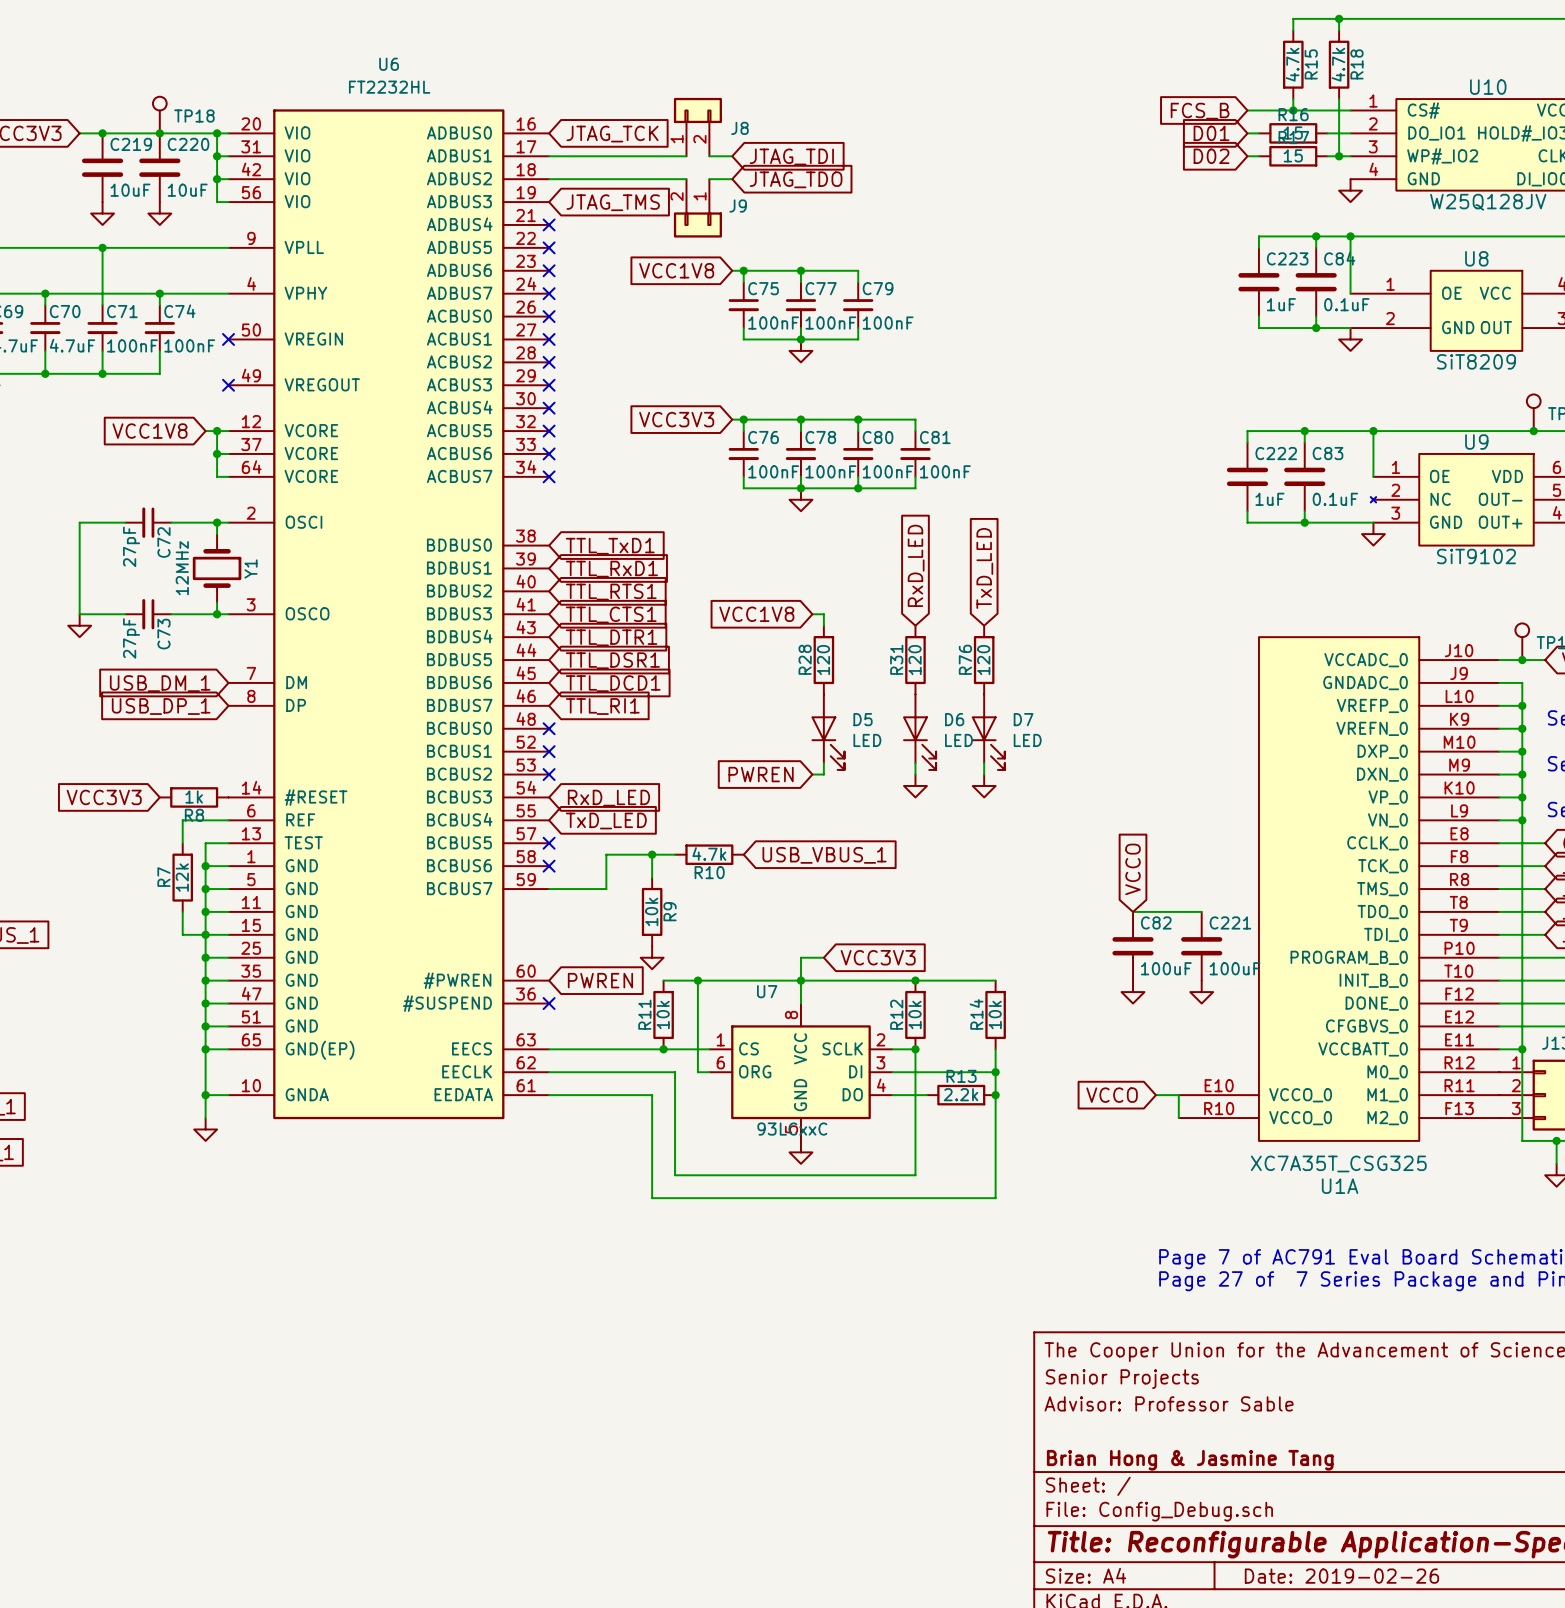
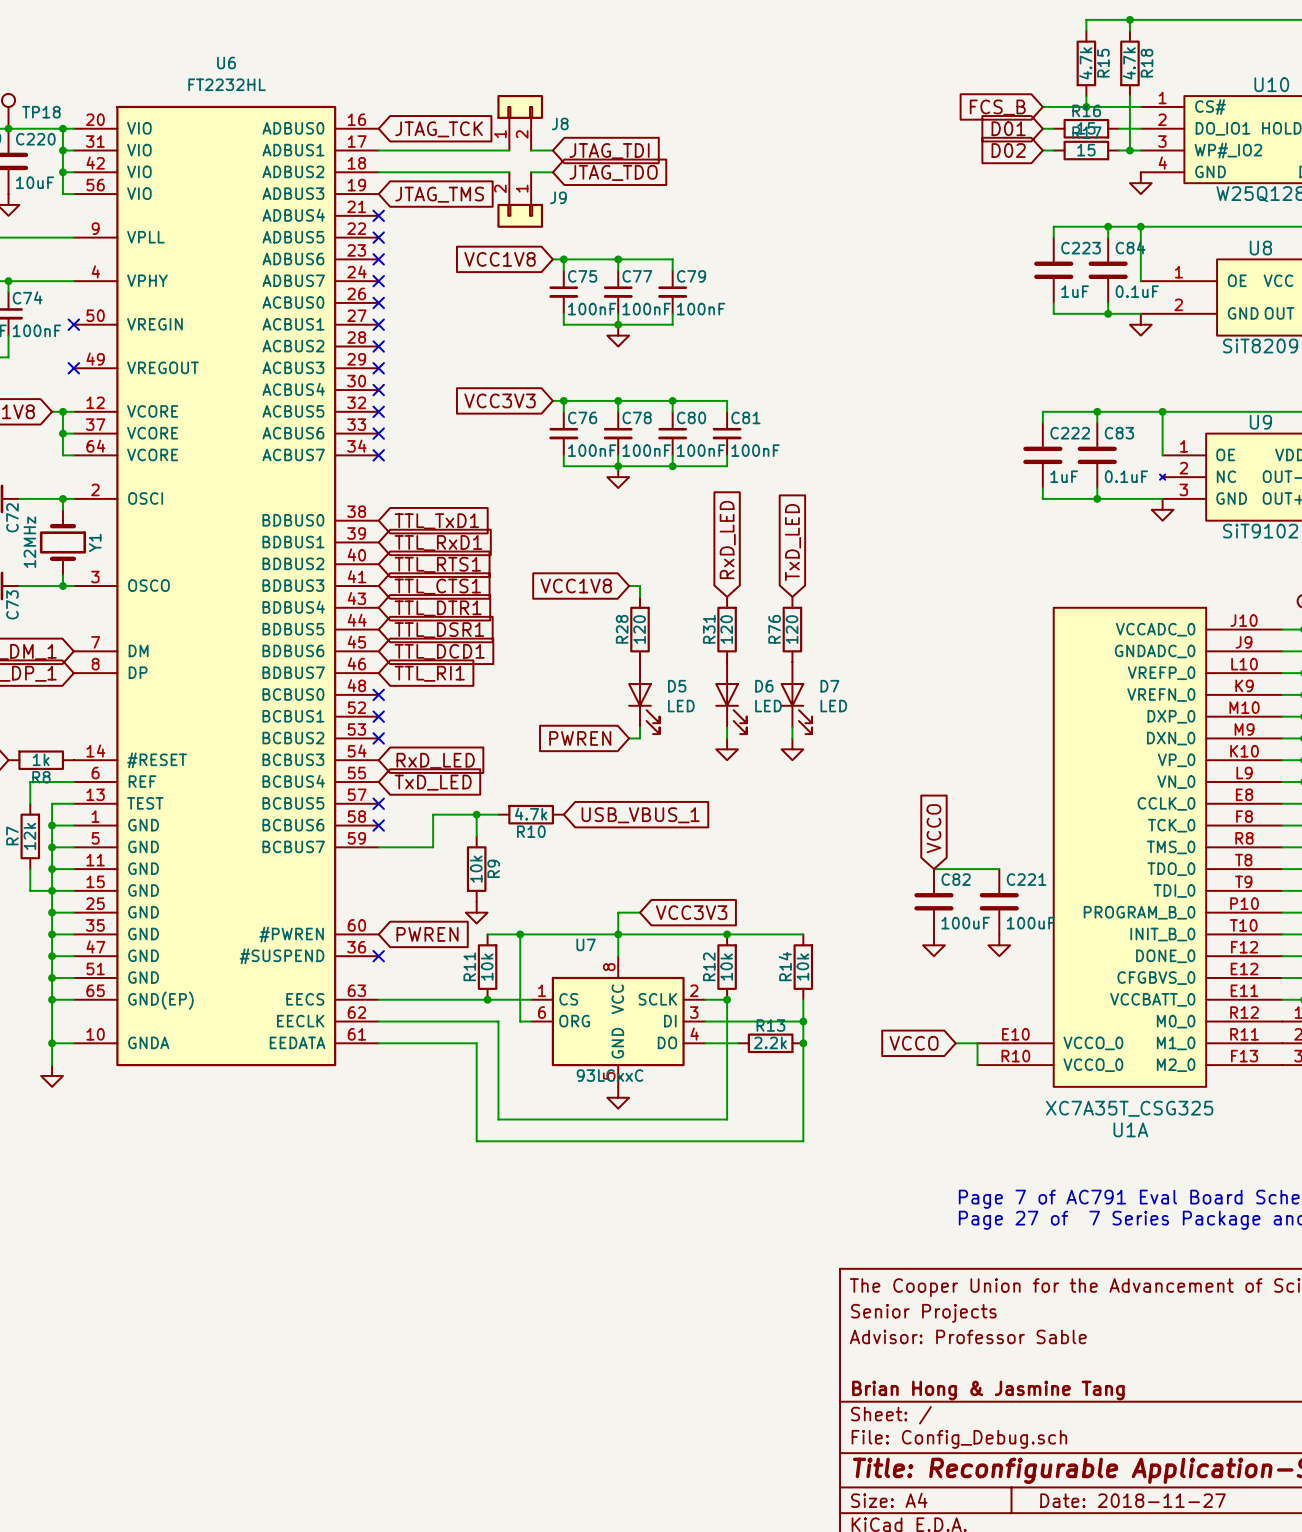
title block: Date: 2019-02-26 (1341, 1576) -> Date: 2018-11-27 (1132, 1500)

